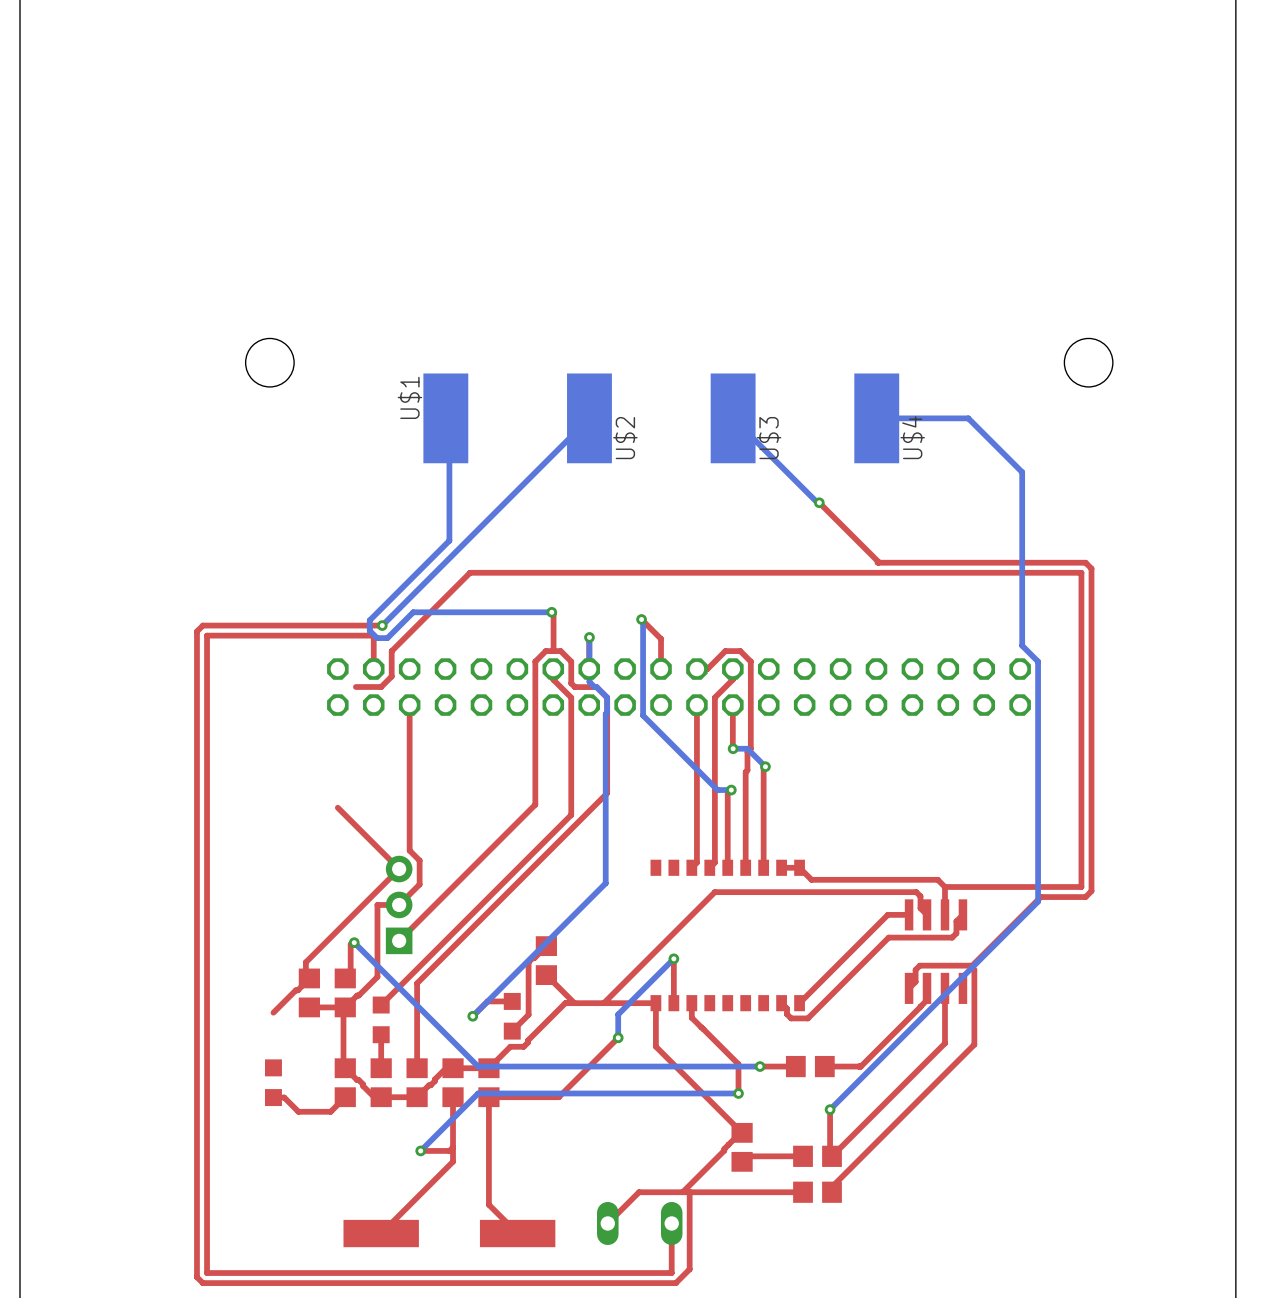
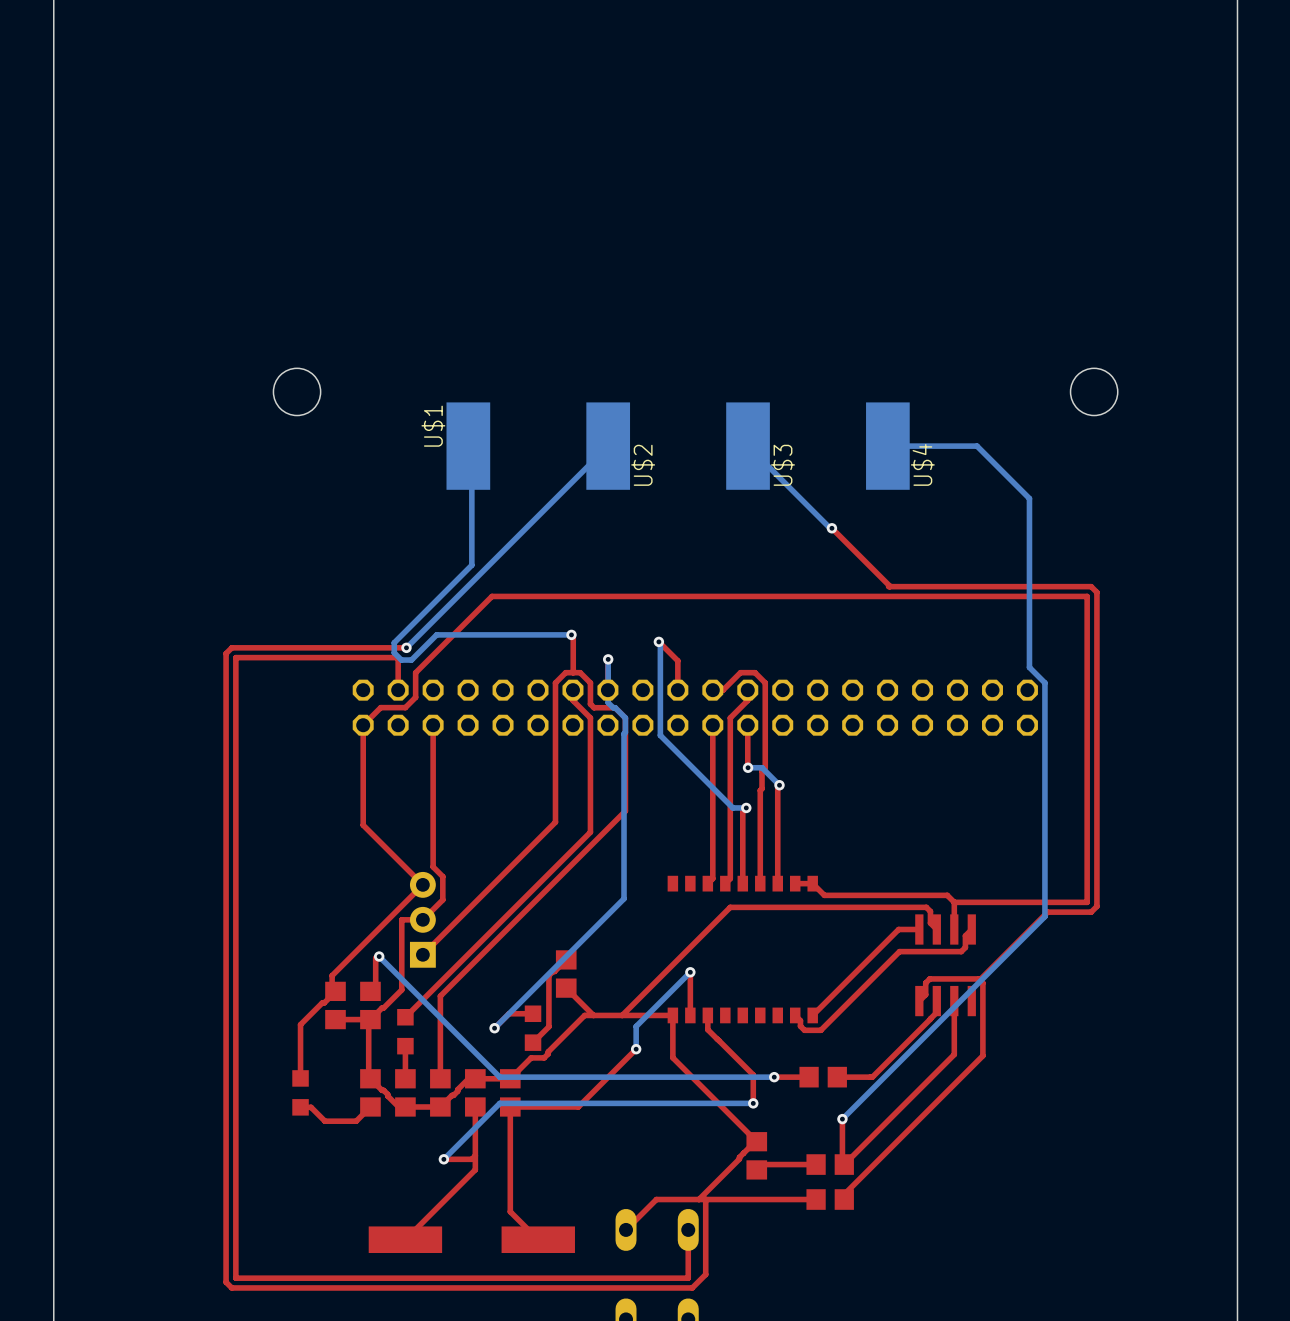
top track: none -> (380, 707) (363, 725) (363, 825)
top track: none -> (300, 1024) (300, 1078)

